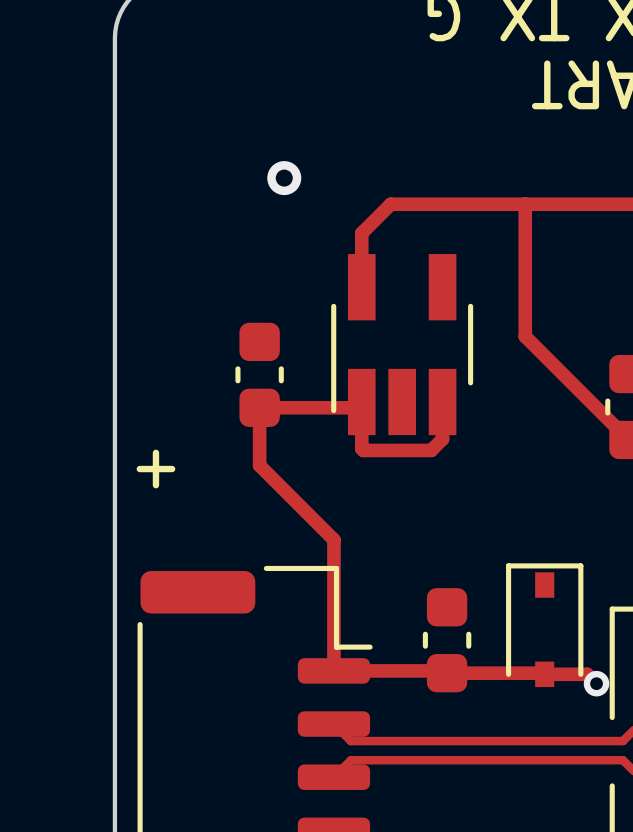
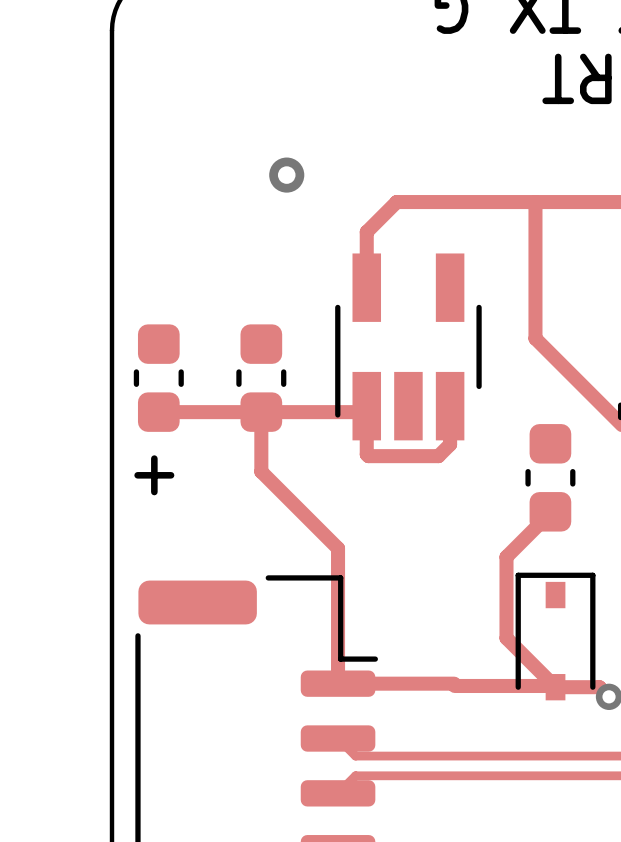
part: none -> (158, 378)
track: none -> (158, 412) (261, 412)
track: none -> (555, 507) (506, 556) (506, 638) (552, 683)
part position: (447, 640) -> (550, 477)

